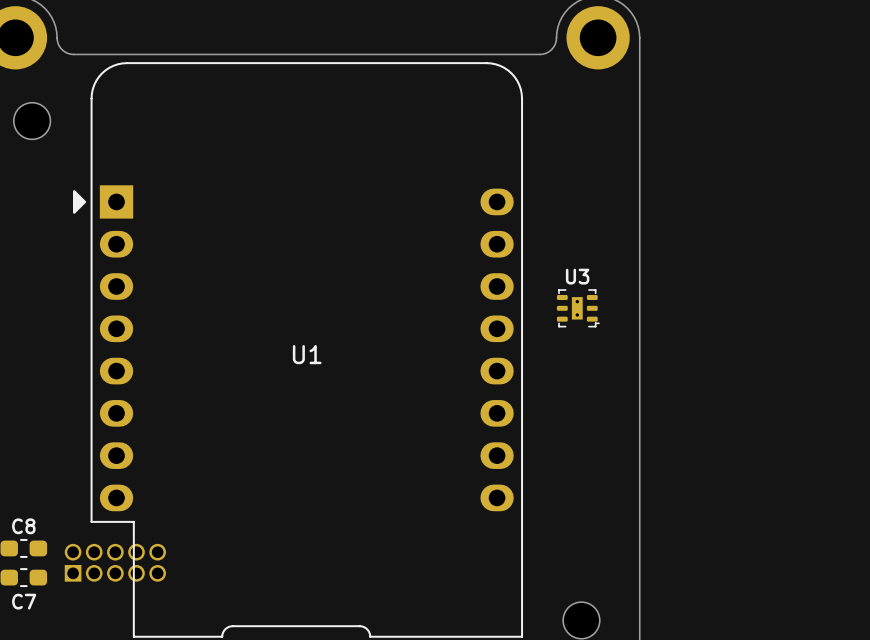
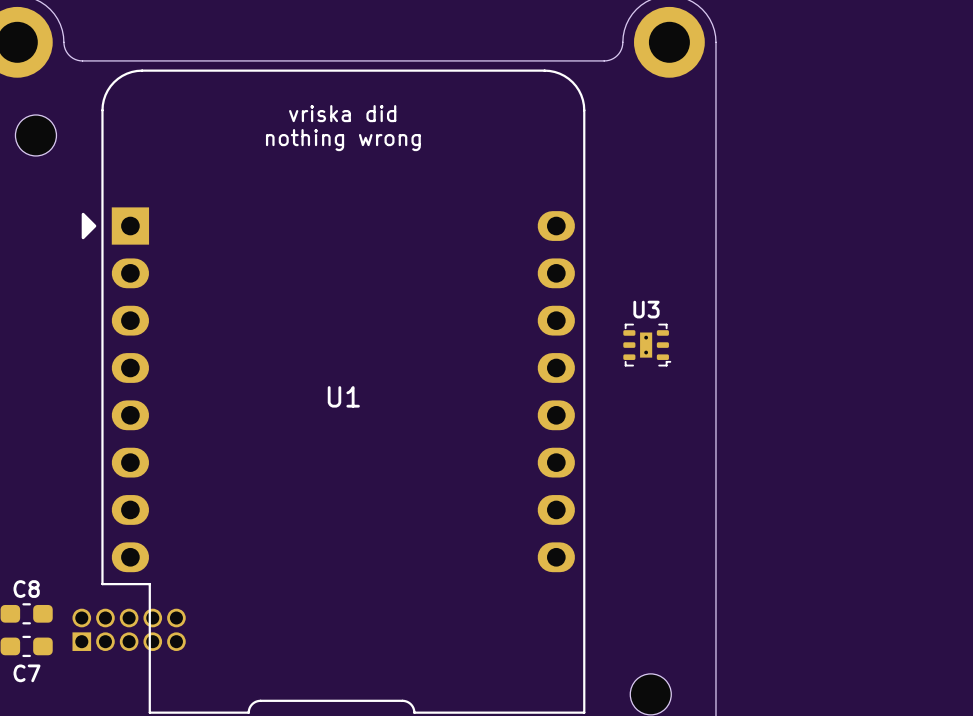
text: none -> vriska did (342, 113)
text: none -> nothing wrong (343, 140)

